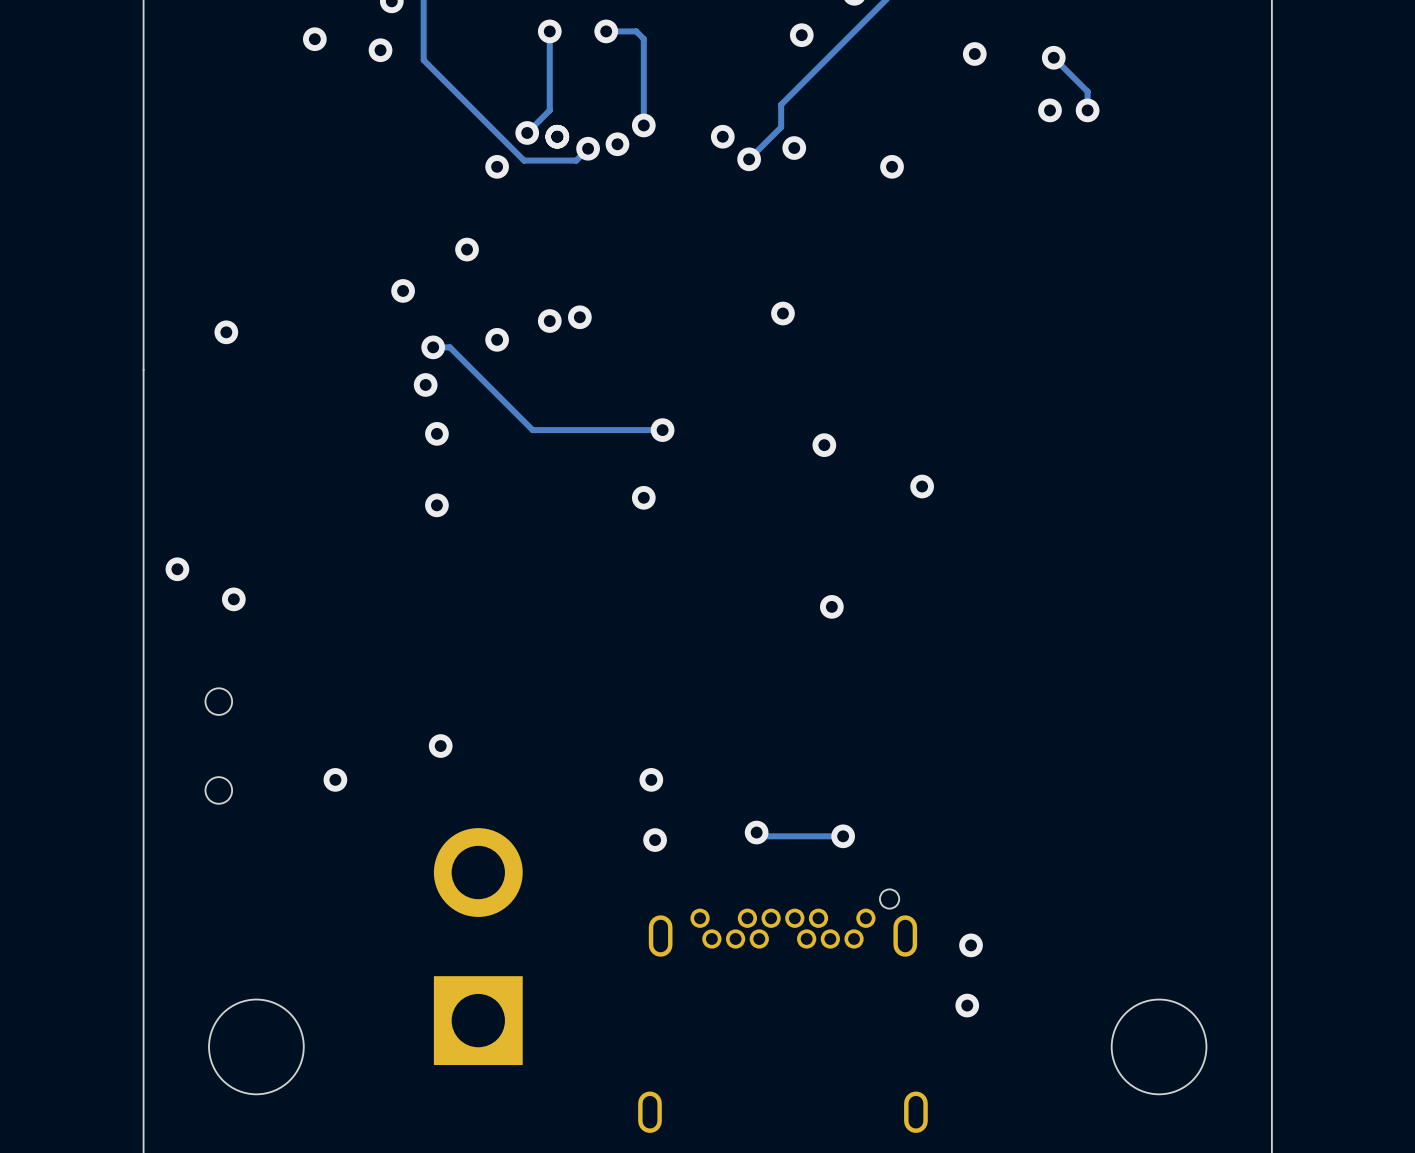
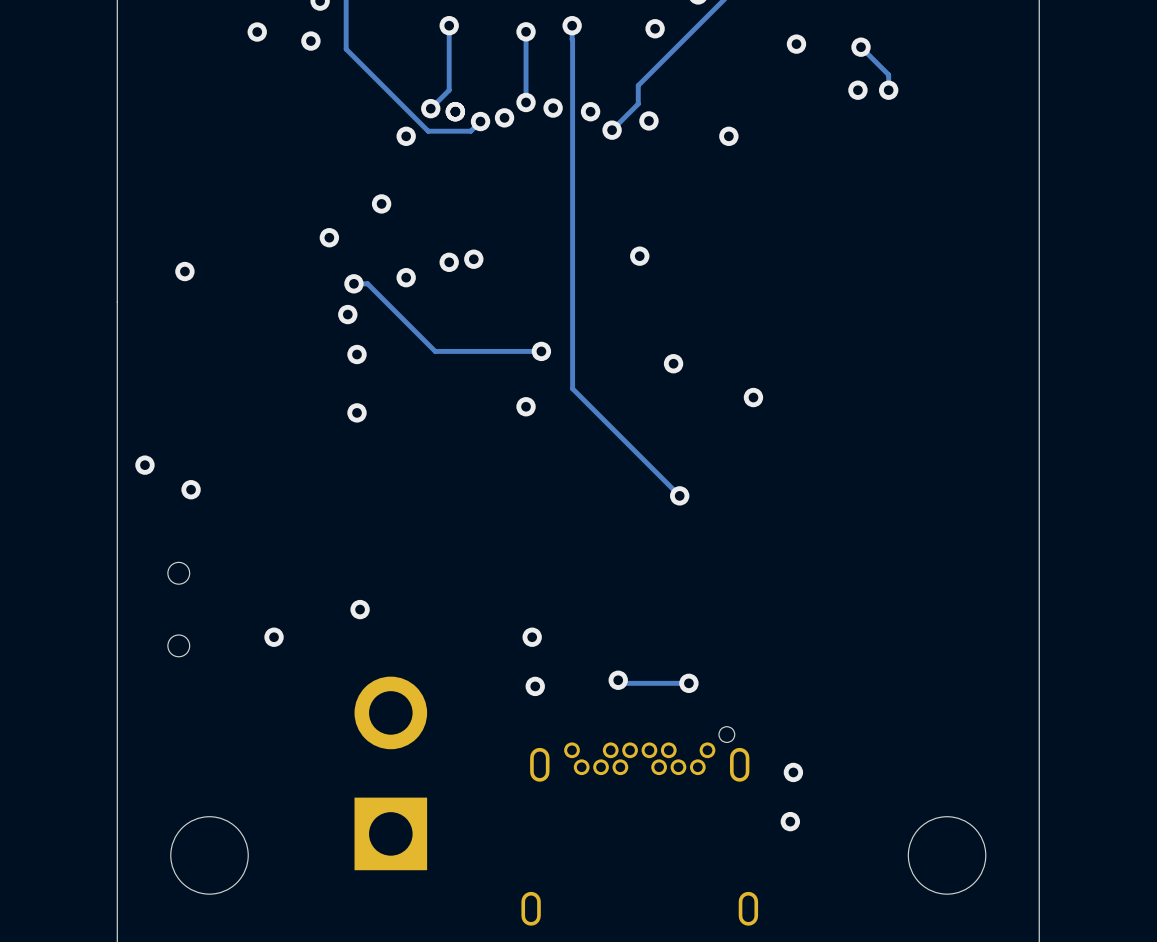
track: (606, 31) (636, 31) (643, 38) -> none
via: (606, 31) -> none
track: none -> (572, 25) (572, 388) (679, 495)
via: none -> (572, 25)
via: none -> (526, 31)
via: none -> (553, 108)

